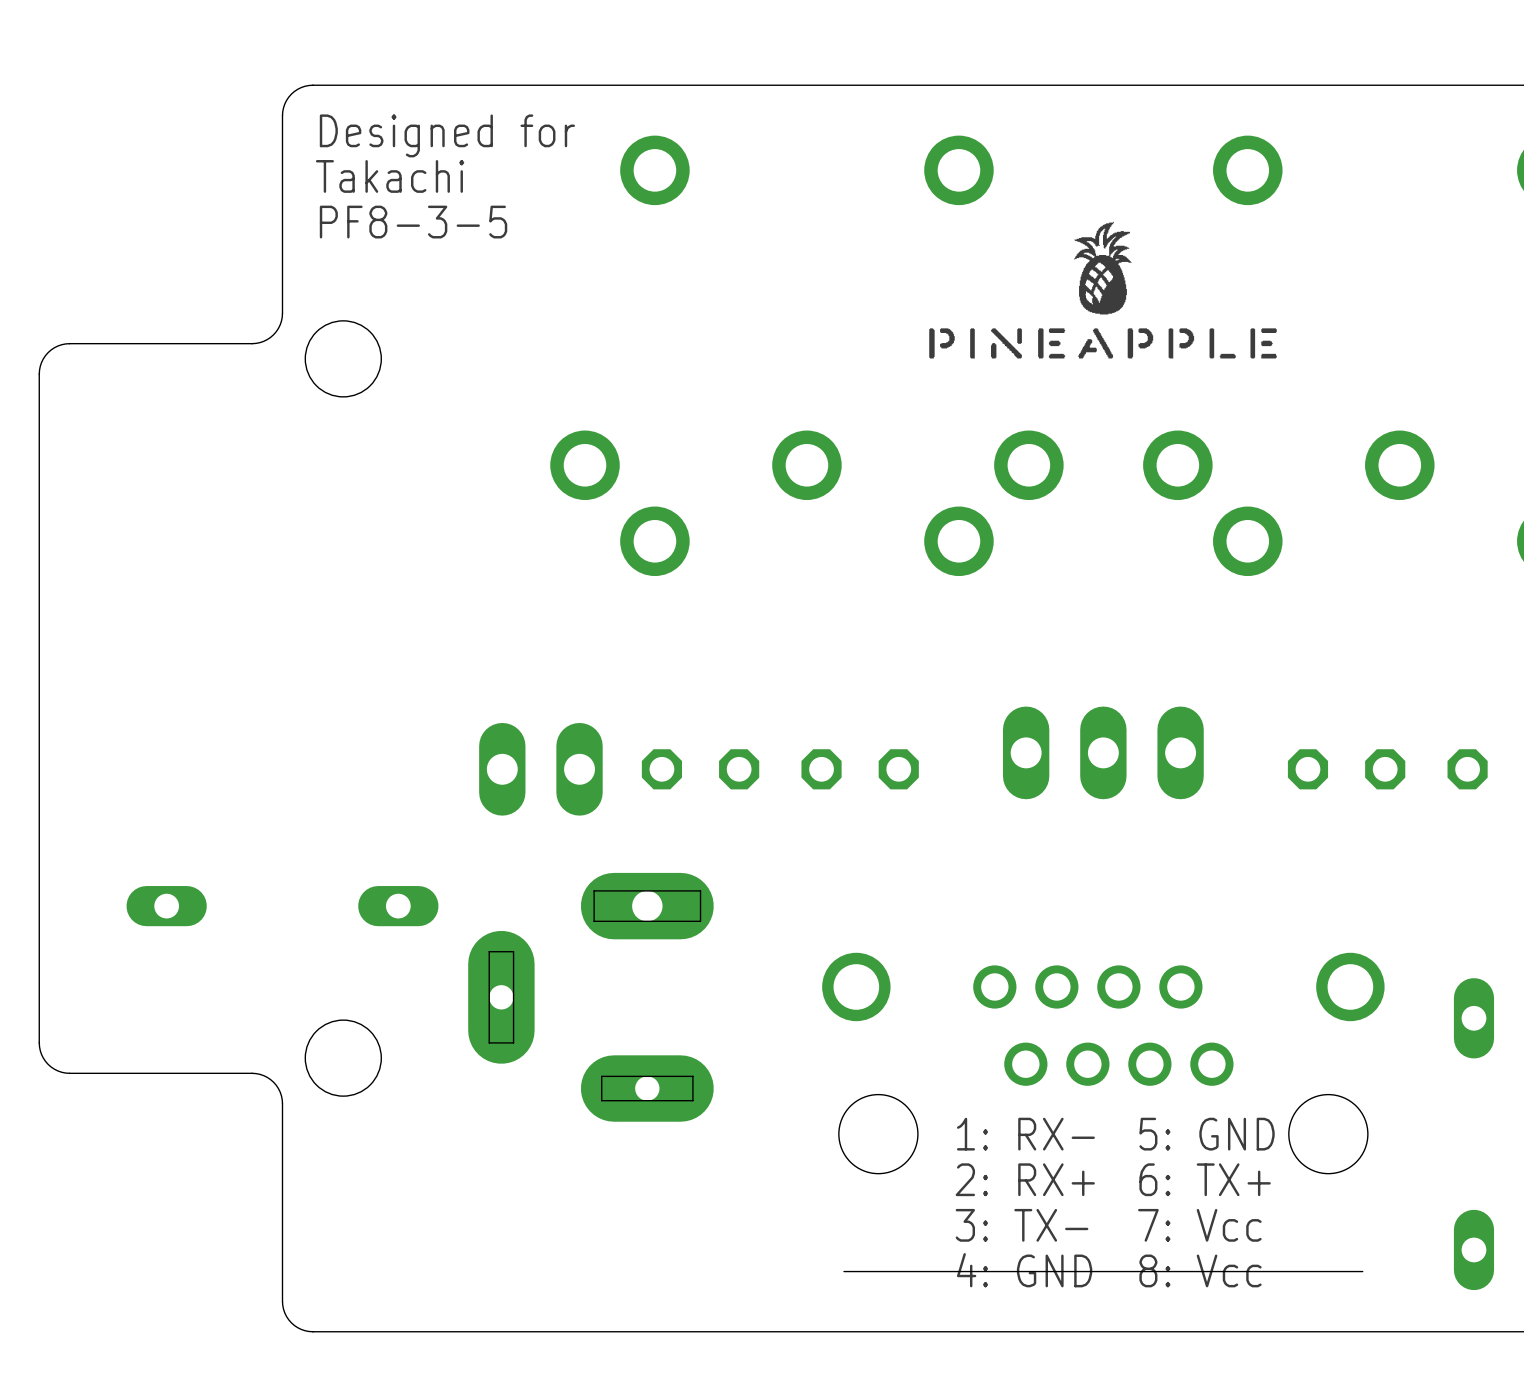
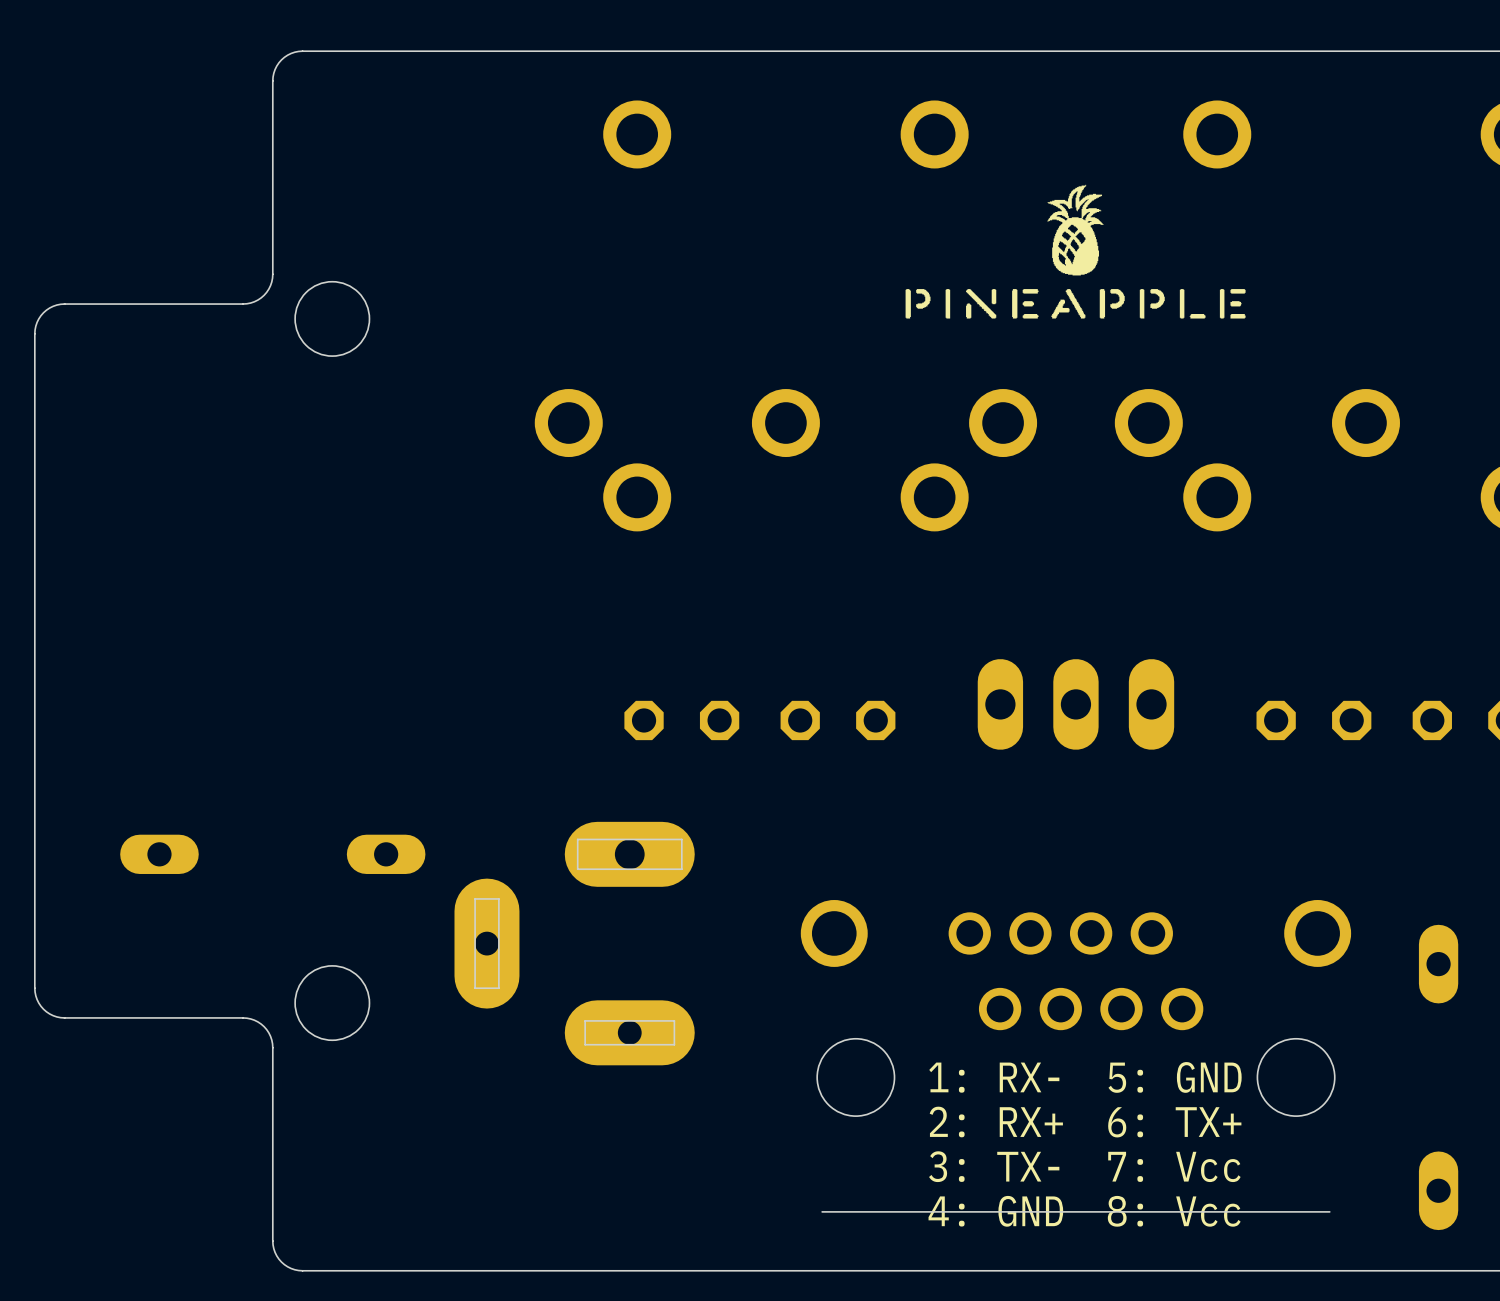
text: Designed for (447, 135) -> none
text: Takachi (390, 176) -> none
text: PF8-3-5 (413, 222) -> none
part: (540, 769) -> none

